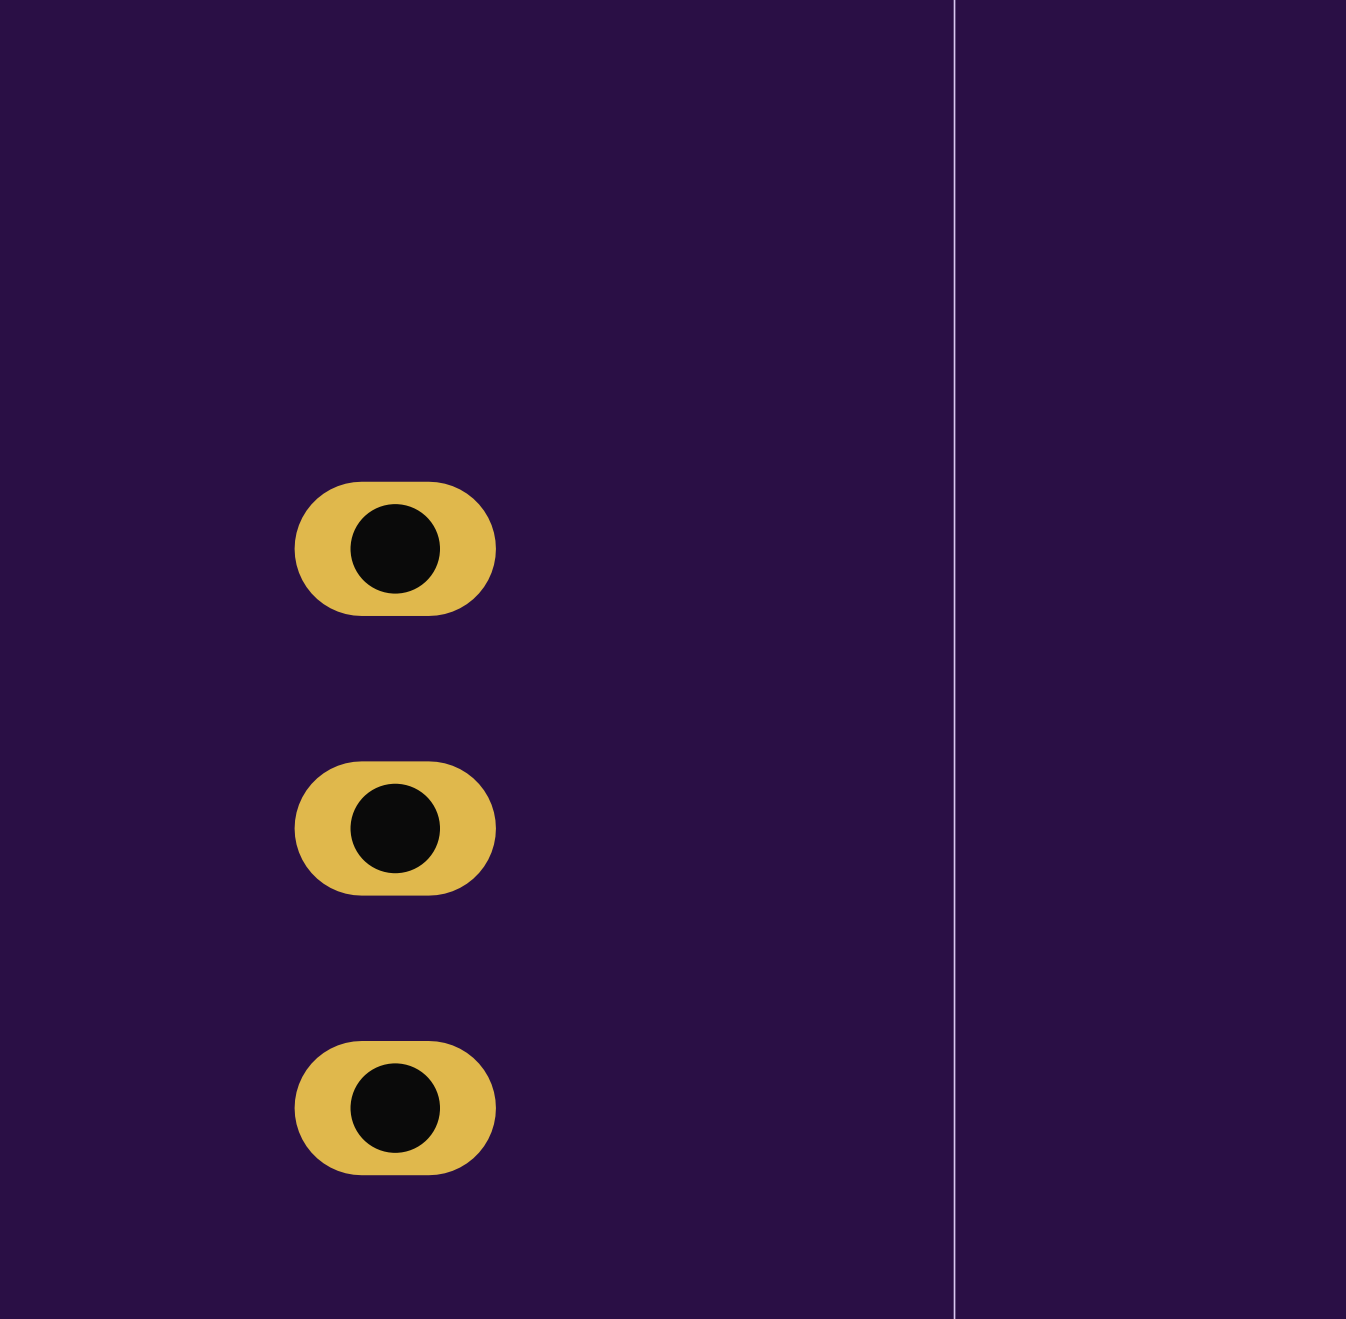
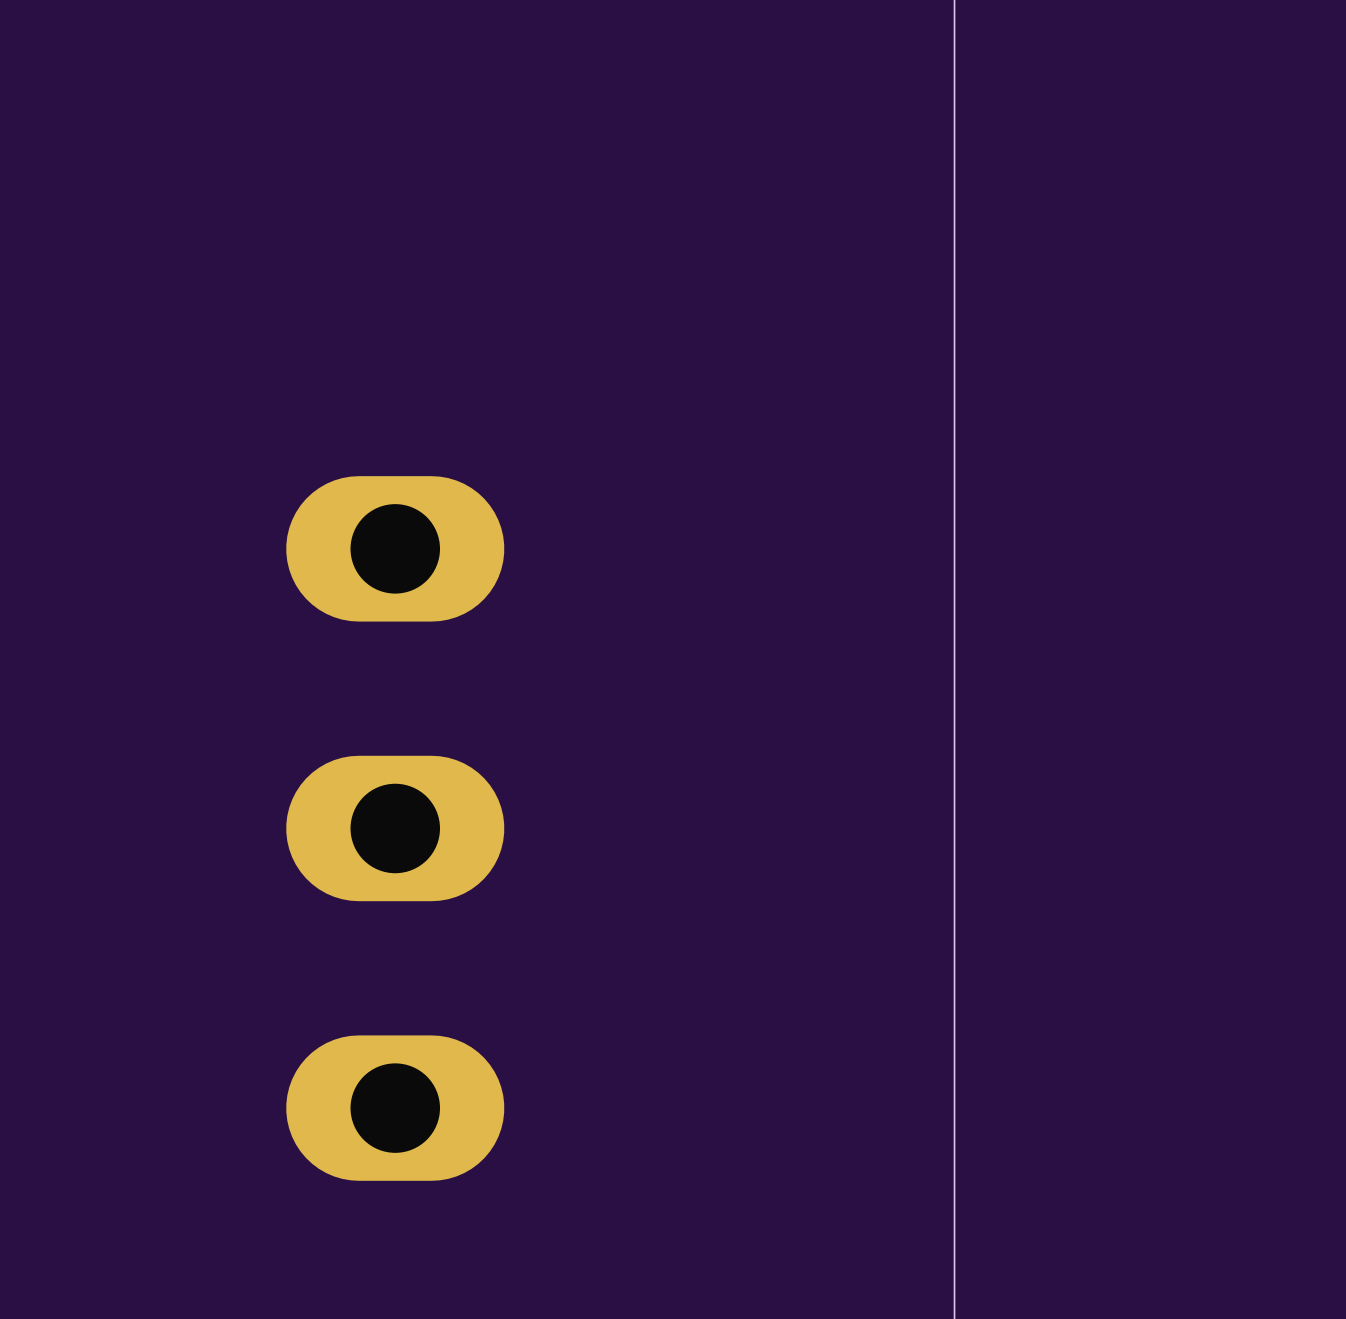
part footprint: [294, 481, 496, 1176] -> [286, 476, 505, 1181]

